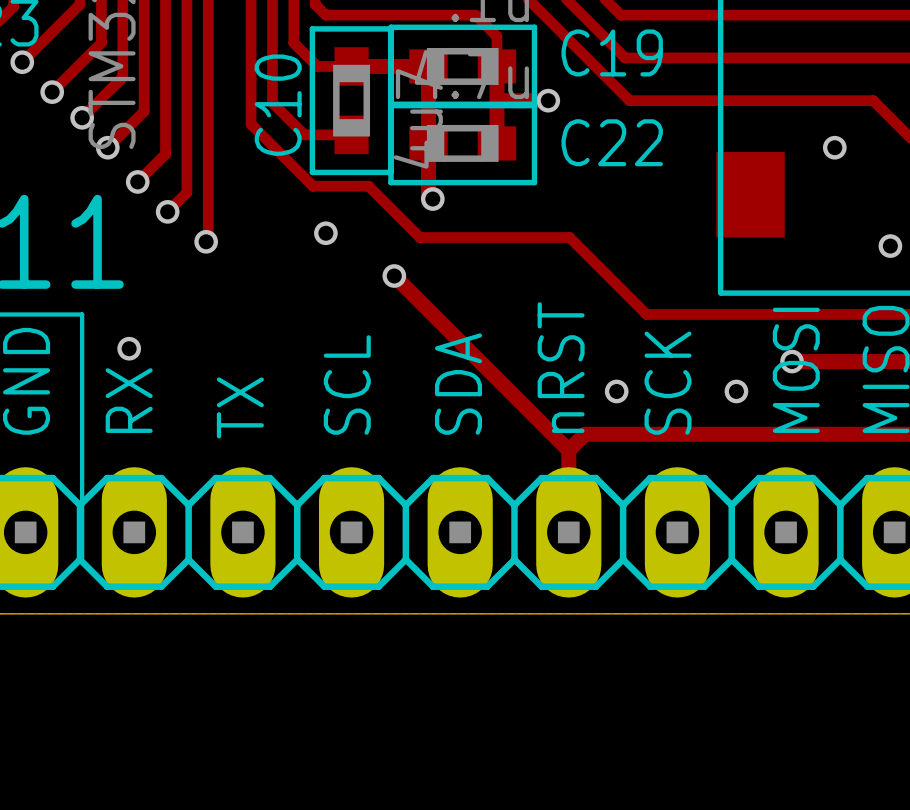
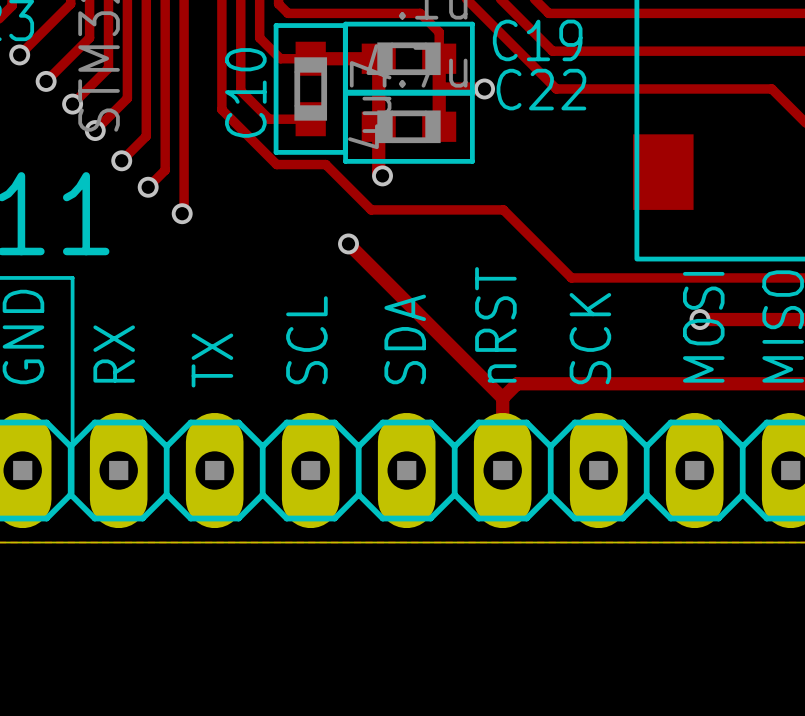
C19 name position: C19 (612, 52) -> C19 (537, 40)
C22 name position: C22 (612, 142) -> C22 (541, 89)
via: (834, 147) -> none
via: (325, 233) -> none
via: (890, 246) -> none
via: (129, 348) -> none
via: (616, 391) -> none
via: (736, 391) -> none

